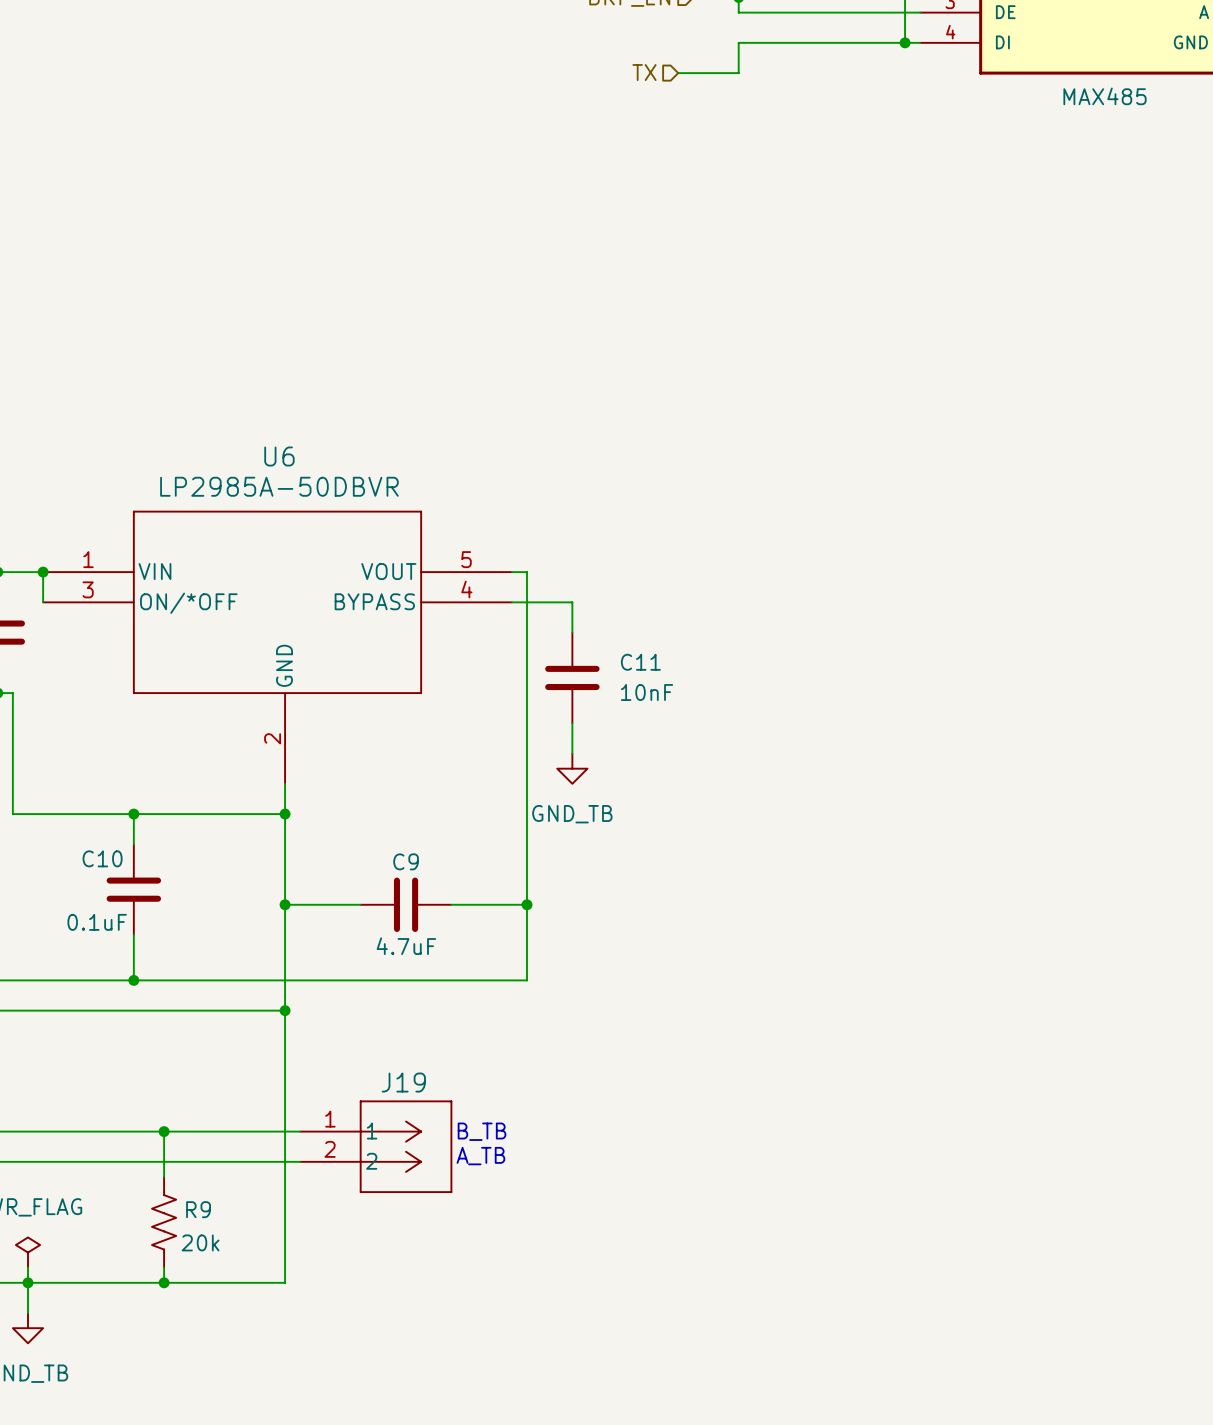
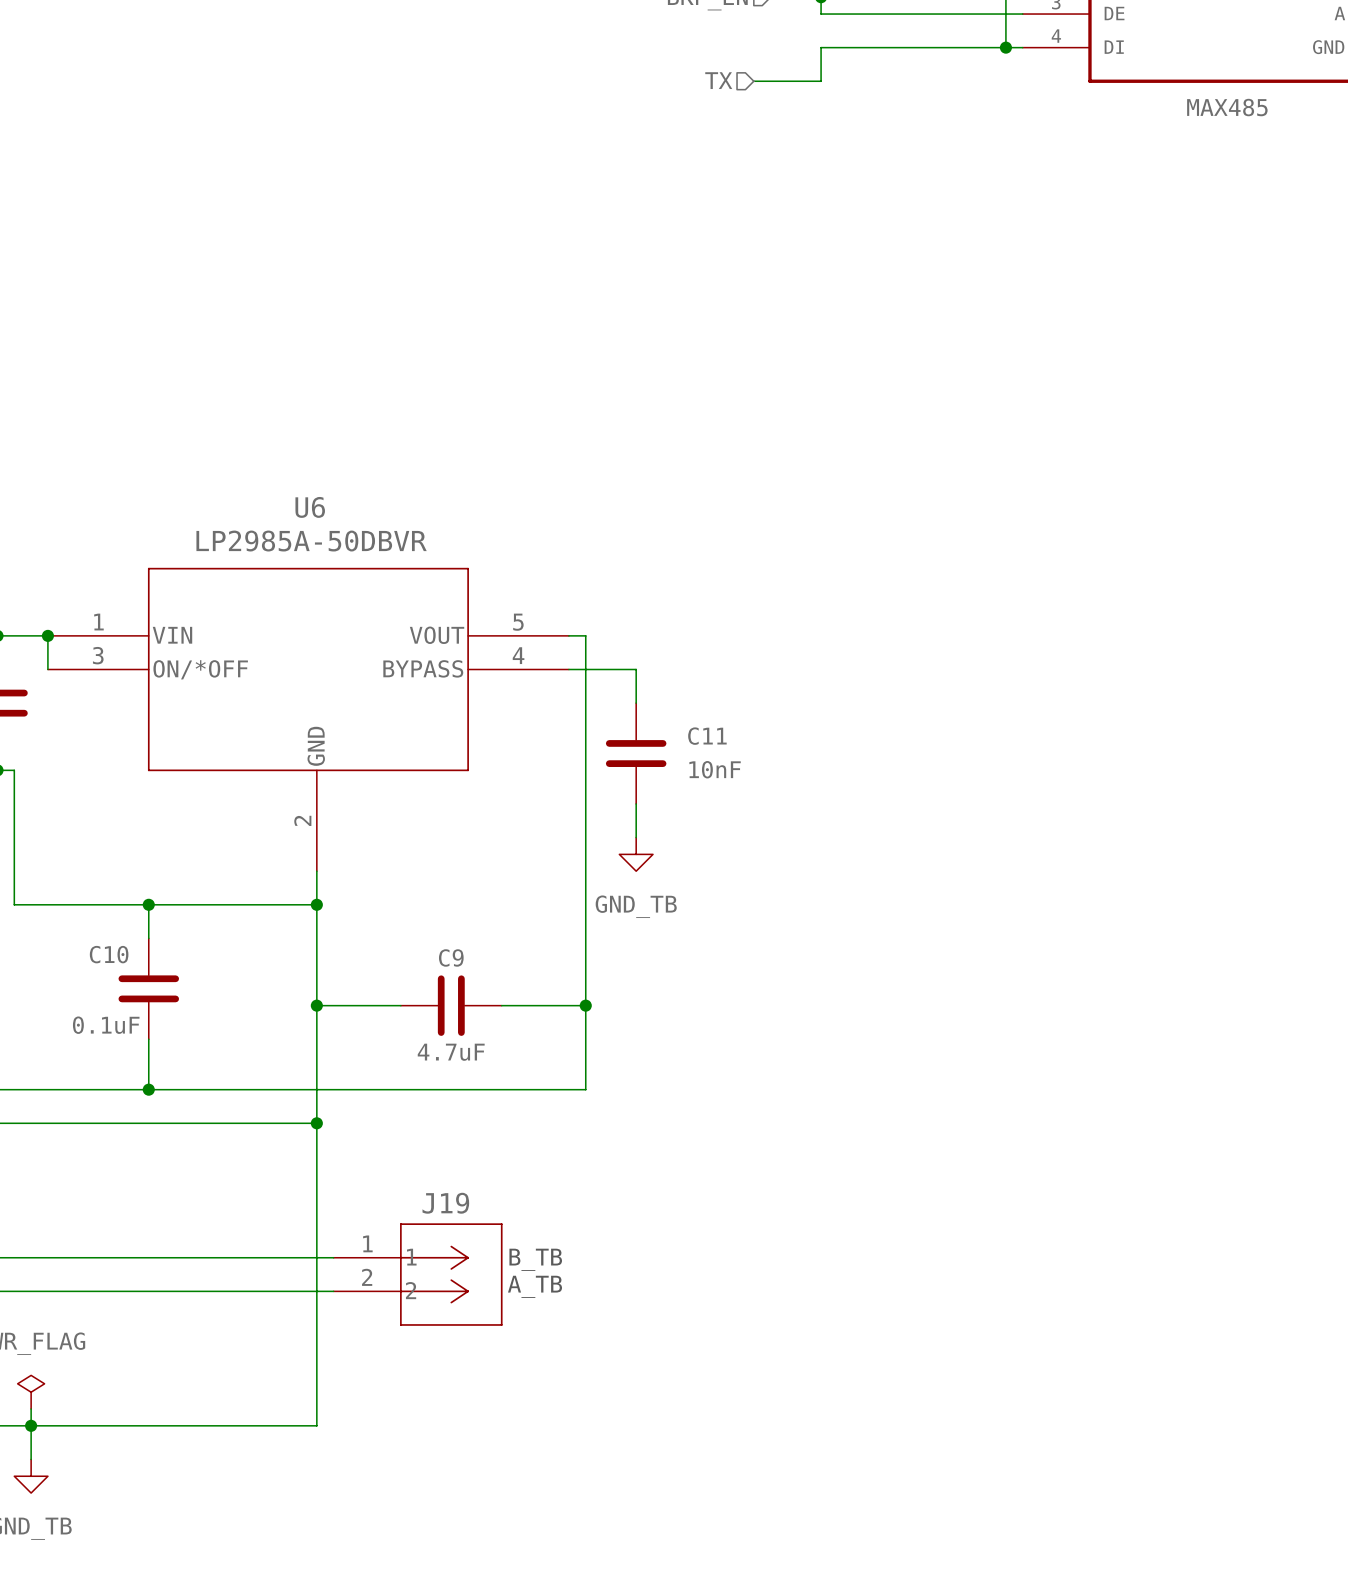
wire: (164, 1131) (164, 1176) -> none
junction: (164, 1131) -> none
R9: 20k (164, 1222) -> none
wire: (164, 1267) (164, 1282) -> none
junction: (164, 1282) -> none

